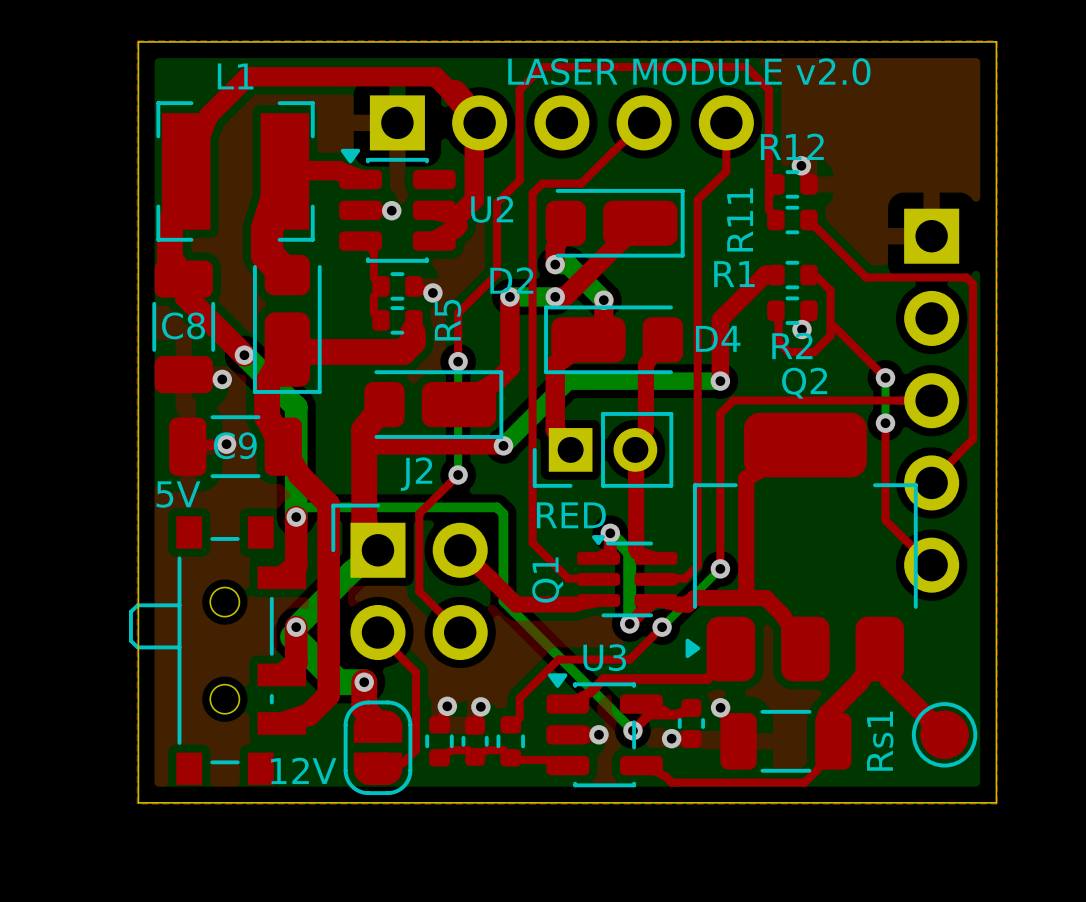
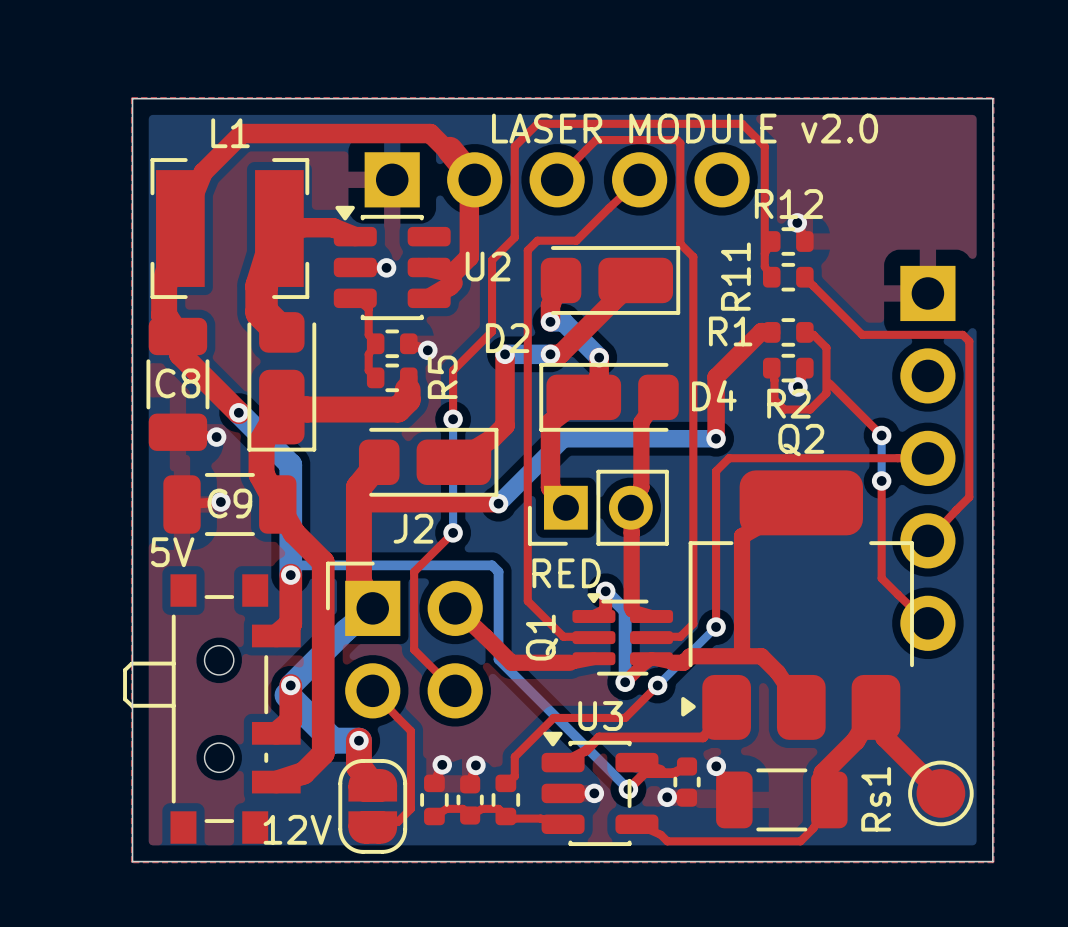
top track: (726, 122) (726, 171) (697, 199) -> (557, 179) (595, 140) (677, 140) (680, 143) (680, 243) (693, 256)

